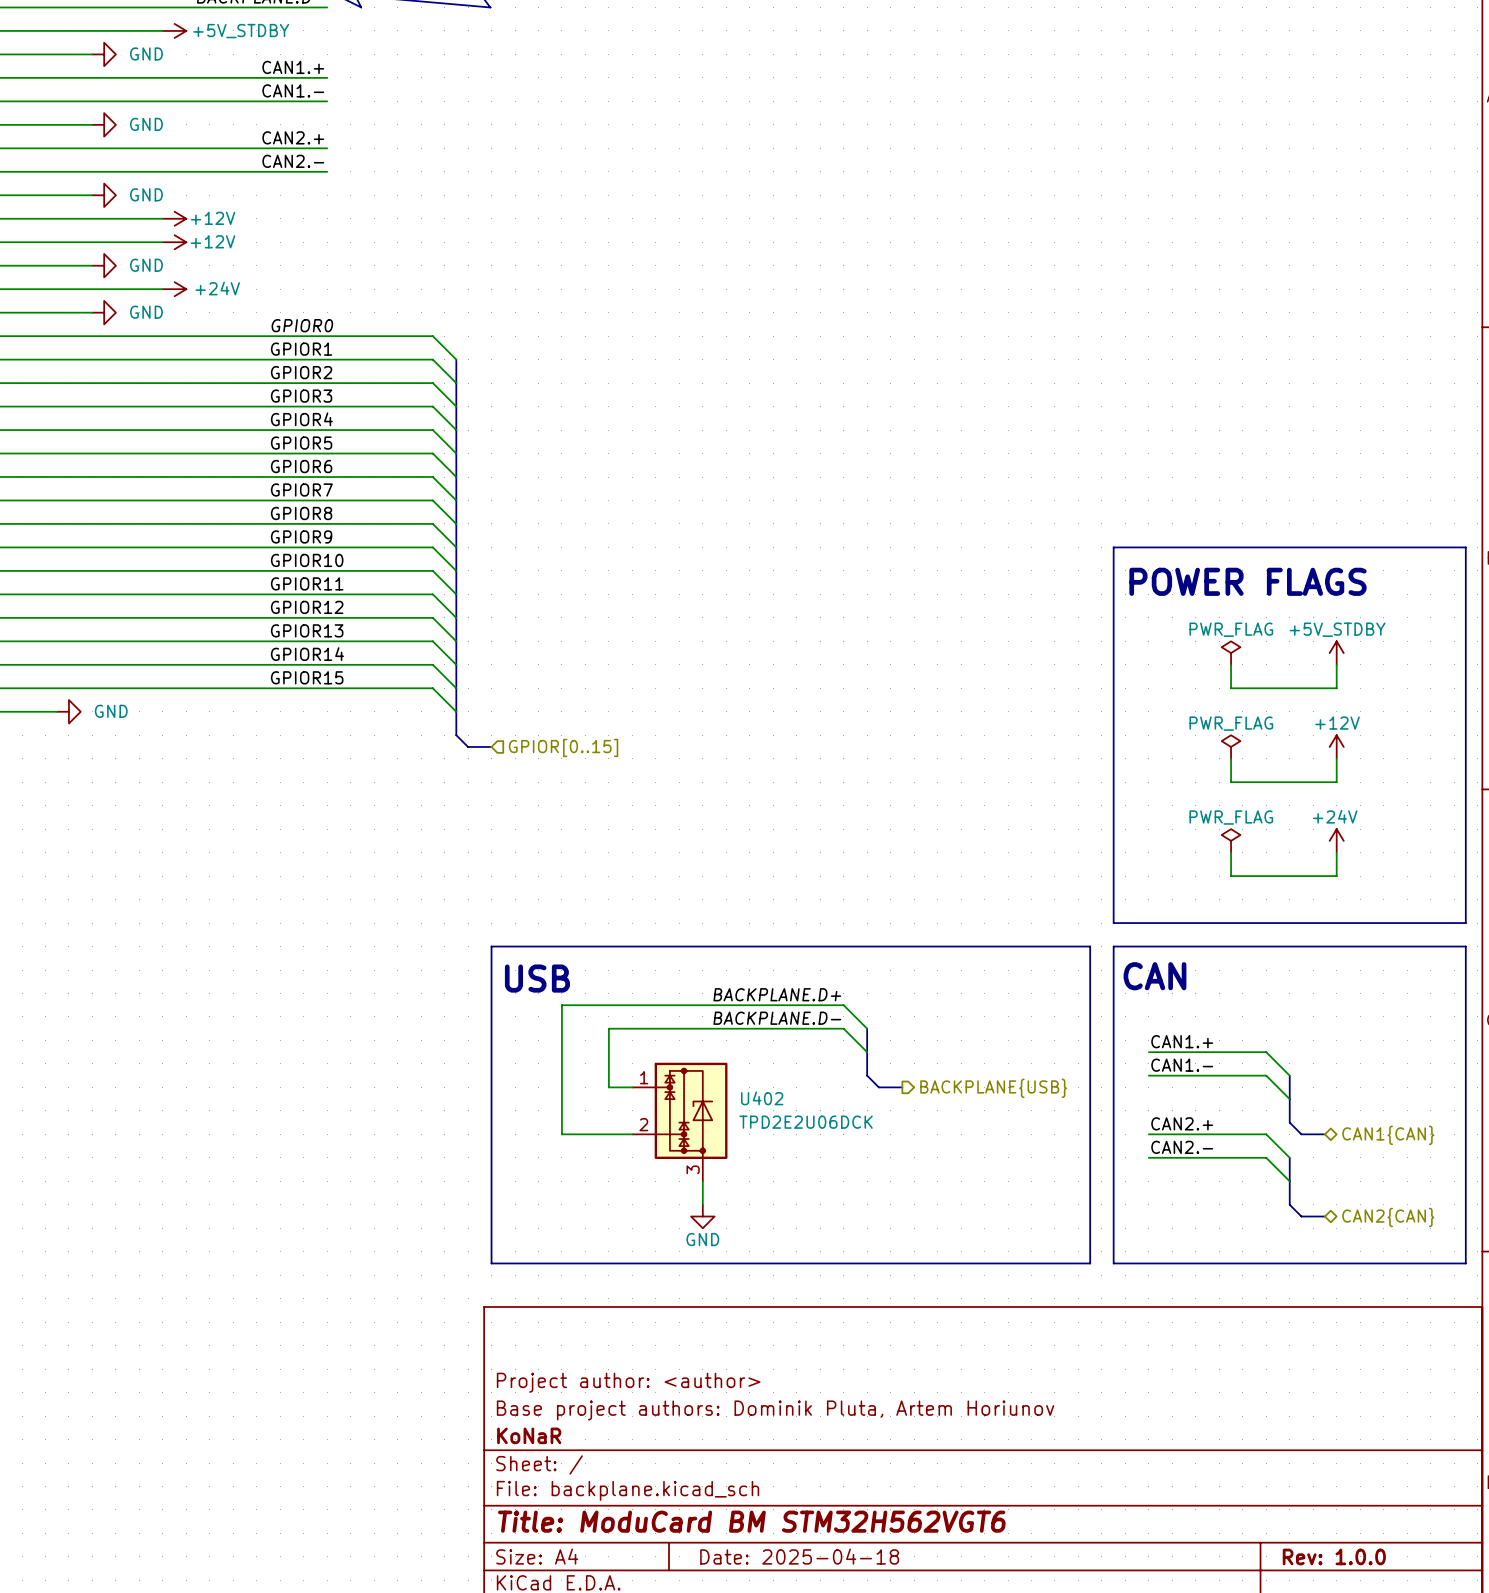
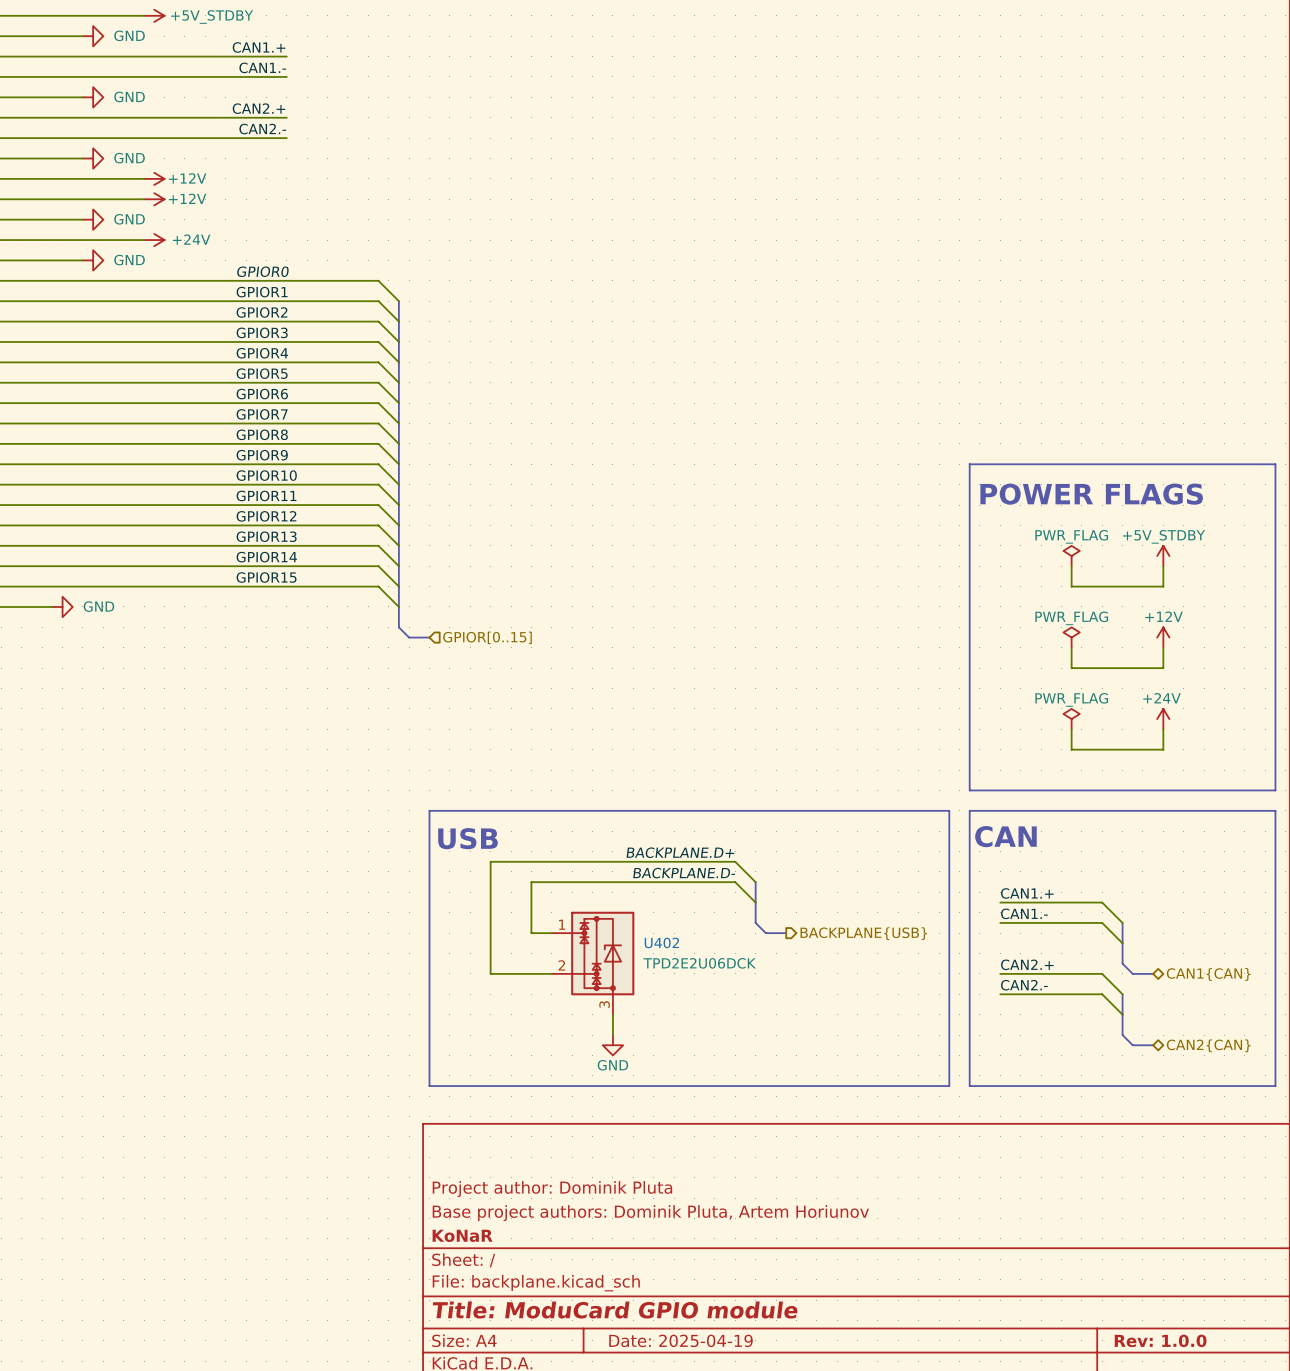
title block: Project author: <author> (628, 1382) -> Project author: Dominik Pluta (552, 1189)
title block: Title: ModuCard BM STM32H562VGT6 (751, 1521) -> Title: ModuCard GPIO module (615, 1310)
title block: Date: 2025-04-18 (799, 1556) -> Date: 2025-04-19 (681, 1340)

